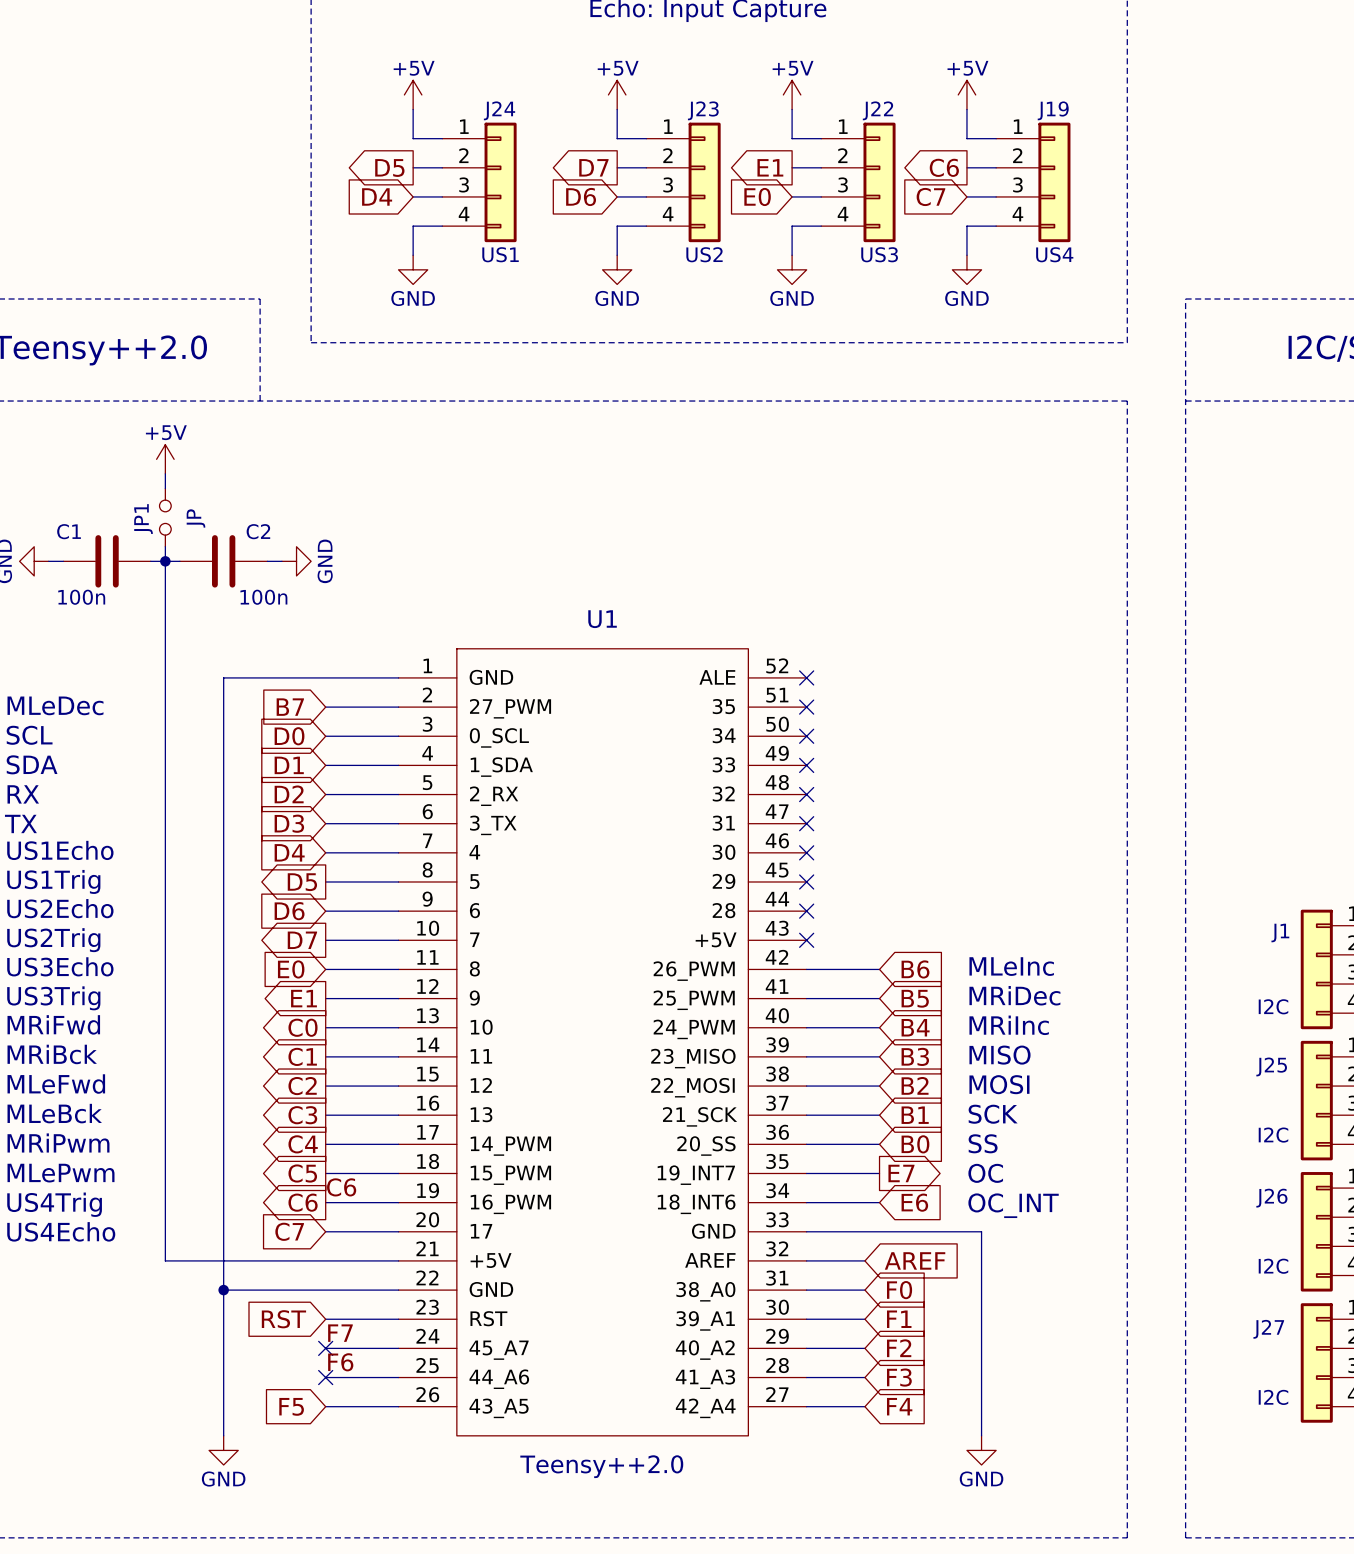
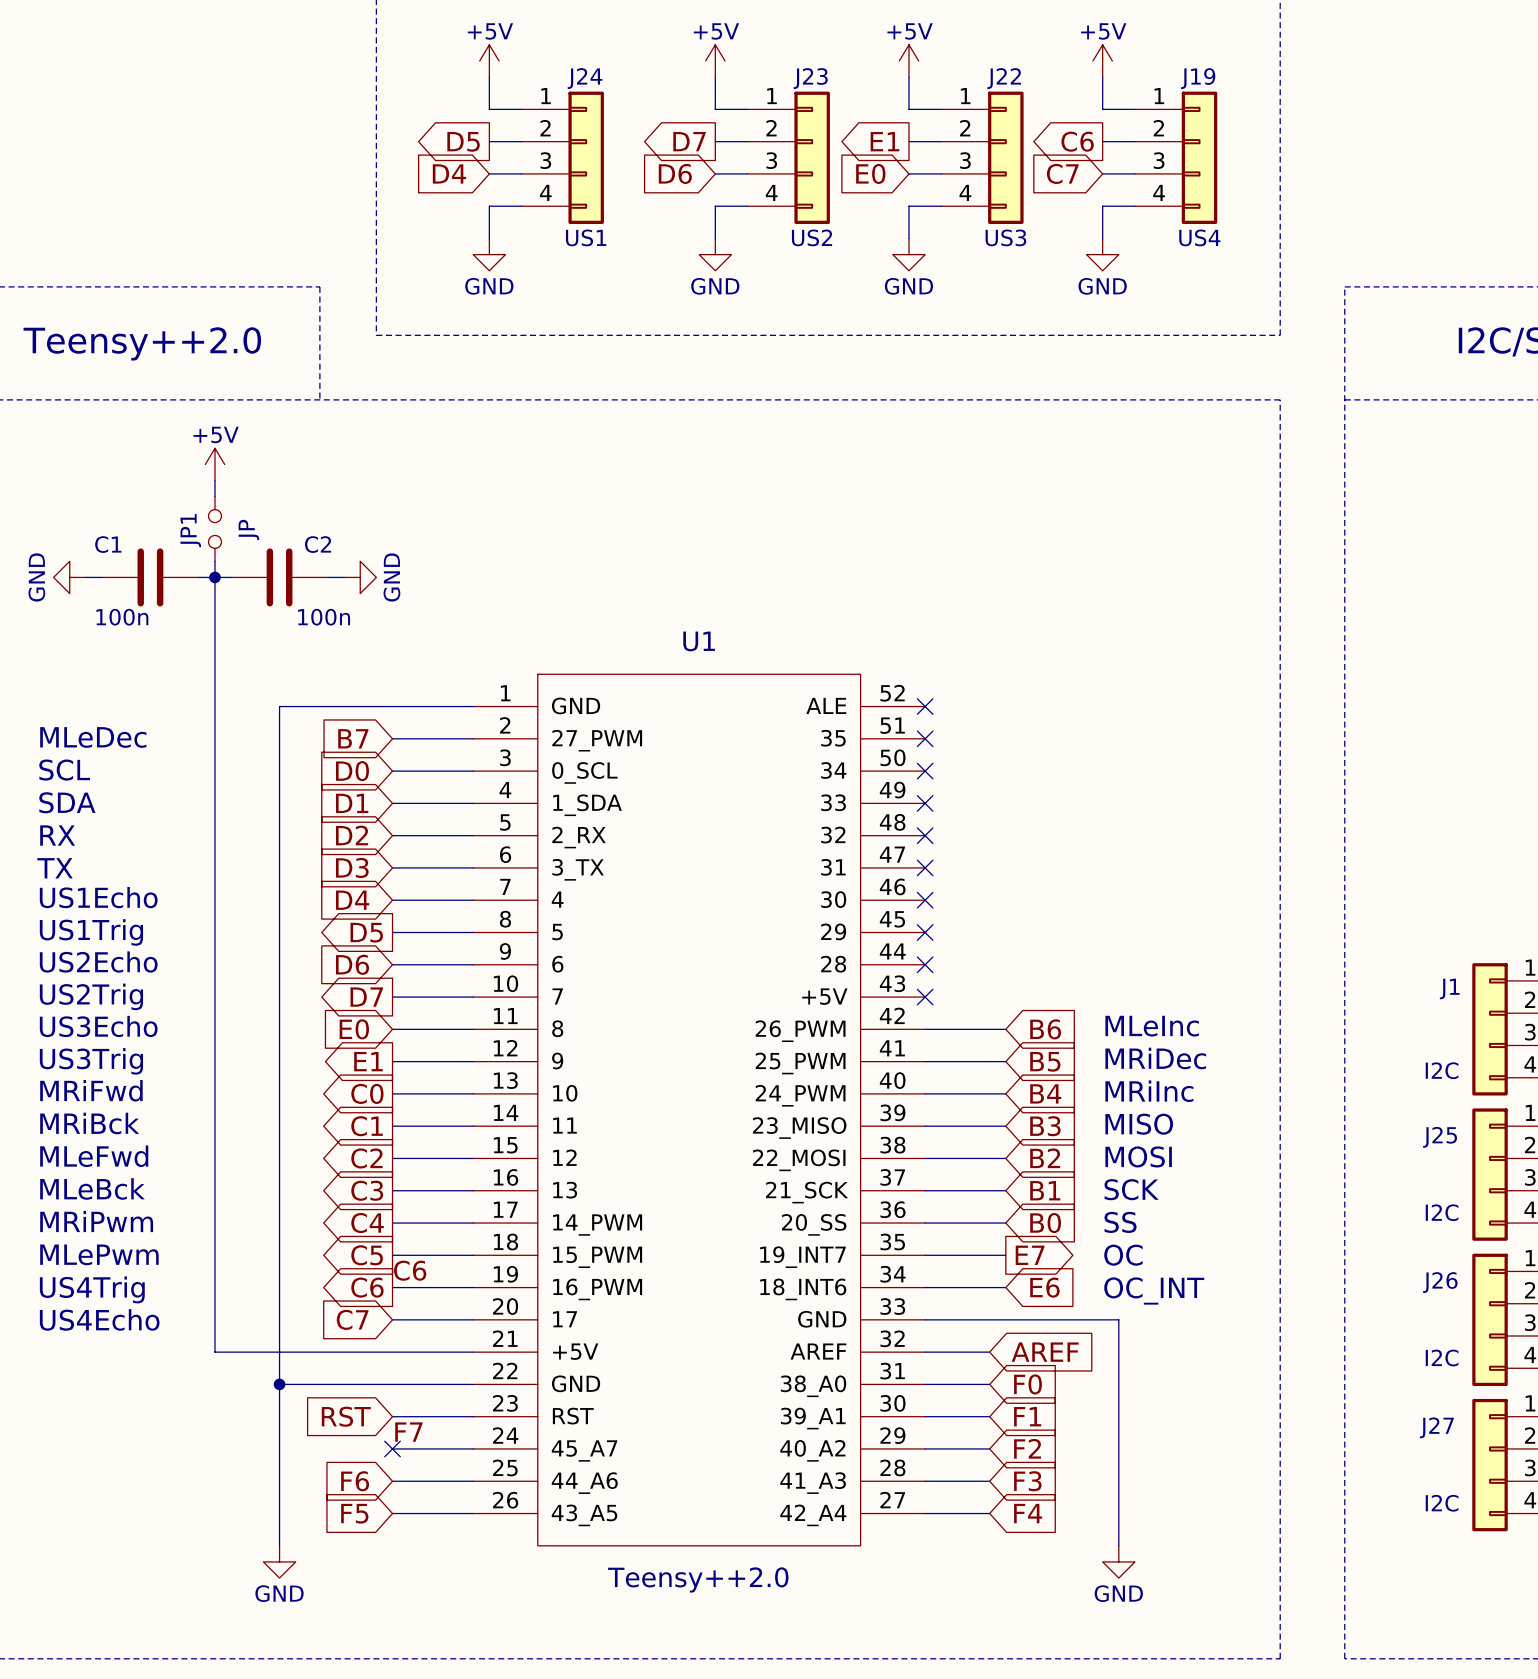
label: F6 (340, 1362) -> none
global label: none -> F6 (355, 1481)
no-connect mark: (325, 1377) -> none

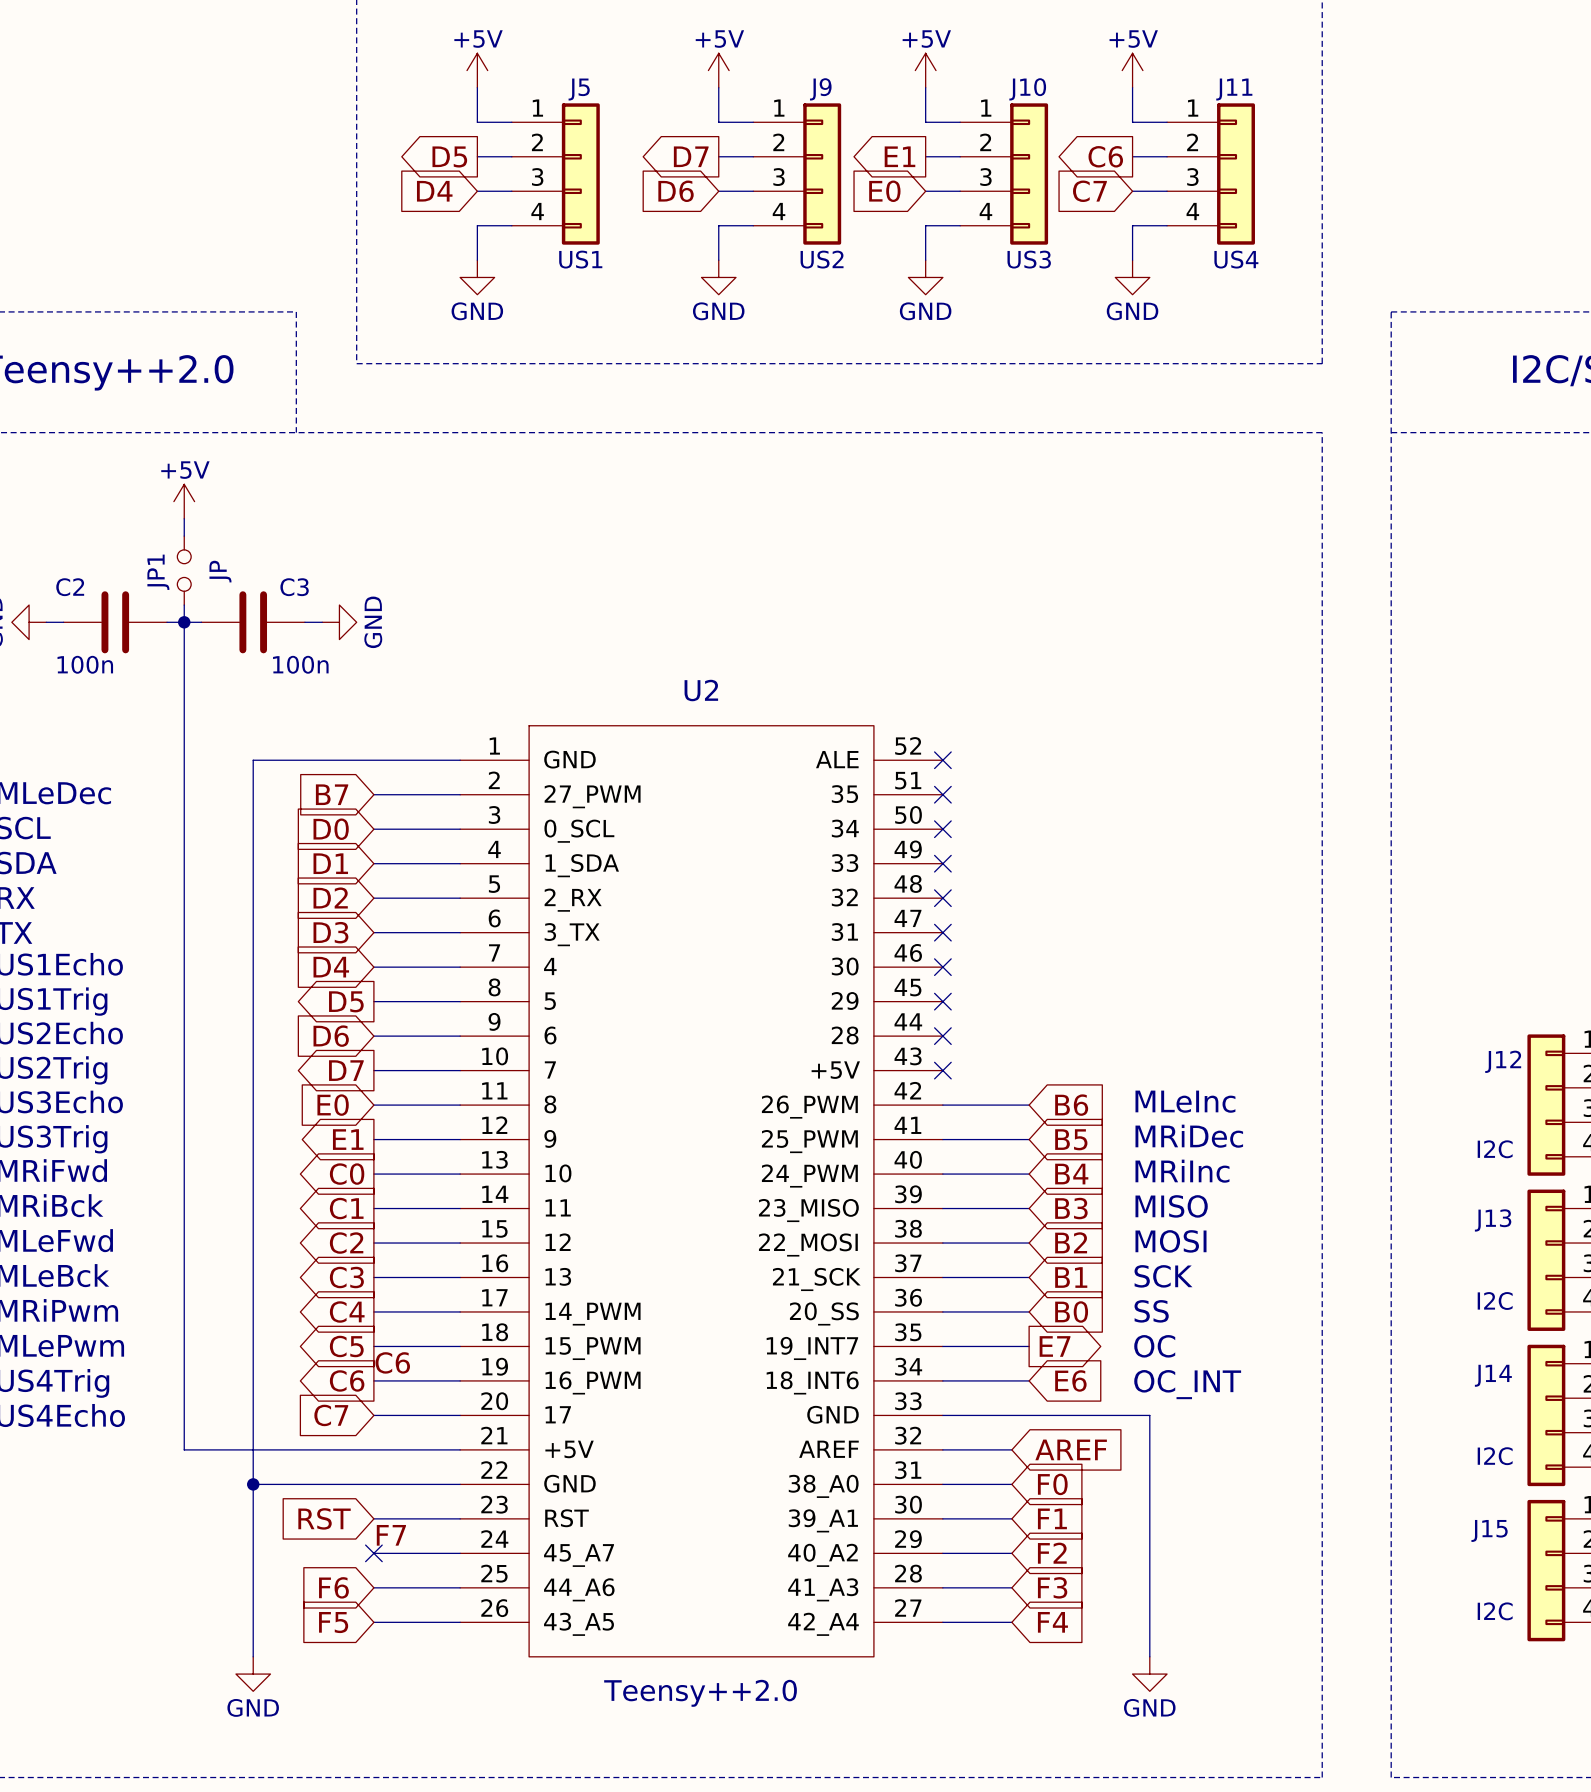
J24 name: J24 (585, 78) -> J5 (579, 89)
J23 name: J23 (810, 78) -> J9 (820, 89)
J22 name: J22 (1004, 78) -> J10 (1027, 89)
J19 name: J19 (1198, 78) -> J11 (1234, 89)
C1 name: C1 (108, 544) -> C2 (70, 587)
C2 name: C2 (318, 544) -> C3 (294, 587)
U1 name: U1 (699, 641) -> U2 (701, 690)
J1 name: J1 (1449, 988) -> J12 (1503, 1061)
J25 name: J25 (1440, 1137) -> J13 (1493, 1220)
J26 name: J26 (1440, 1282) -> J14 (1493, 1375)
J27 name: J27 (1436, 1427) -> J15 (1489, 1530)

